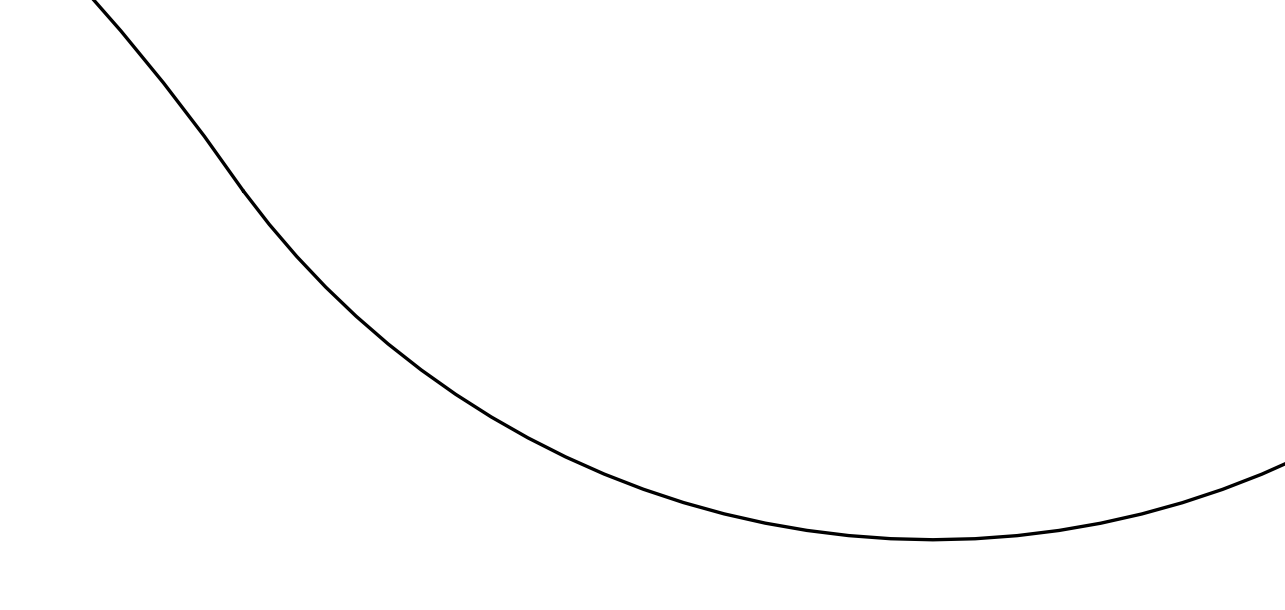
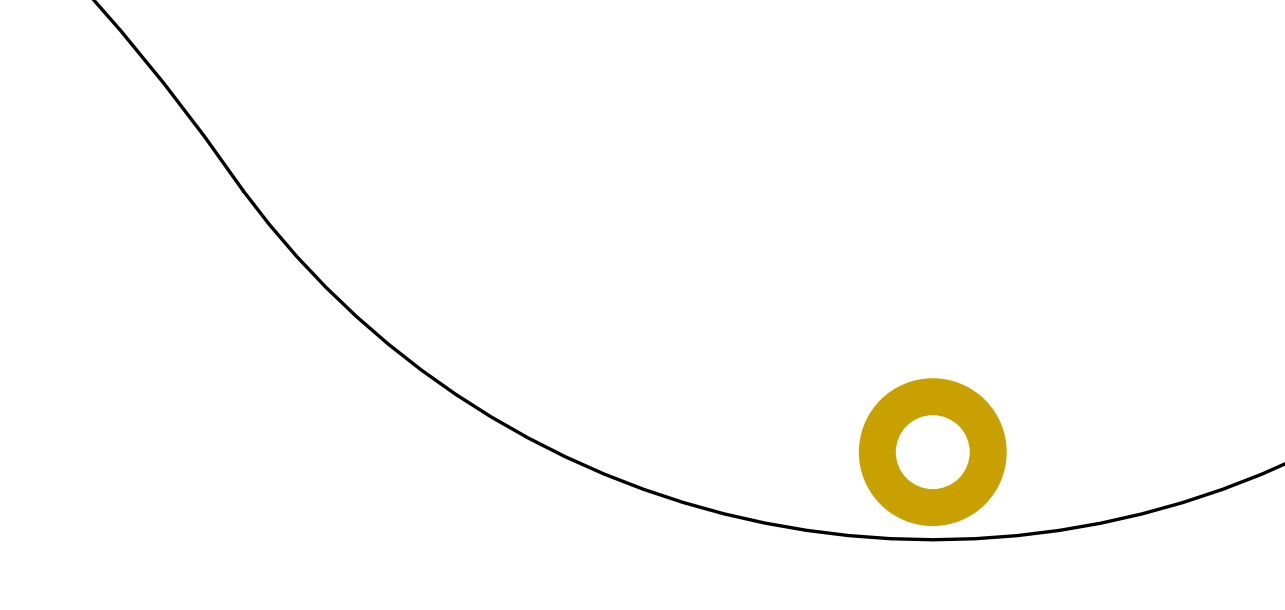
part: none -> (932, 452)

